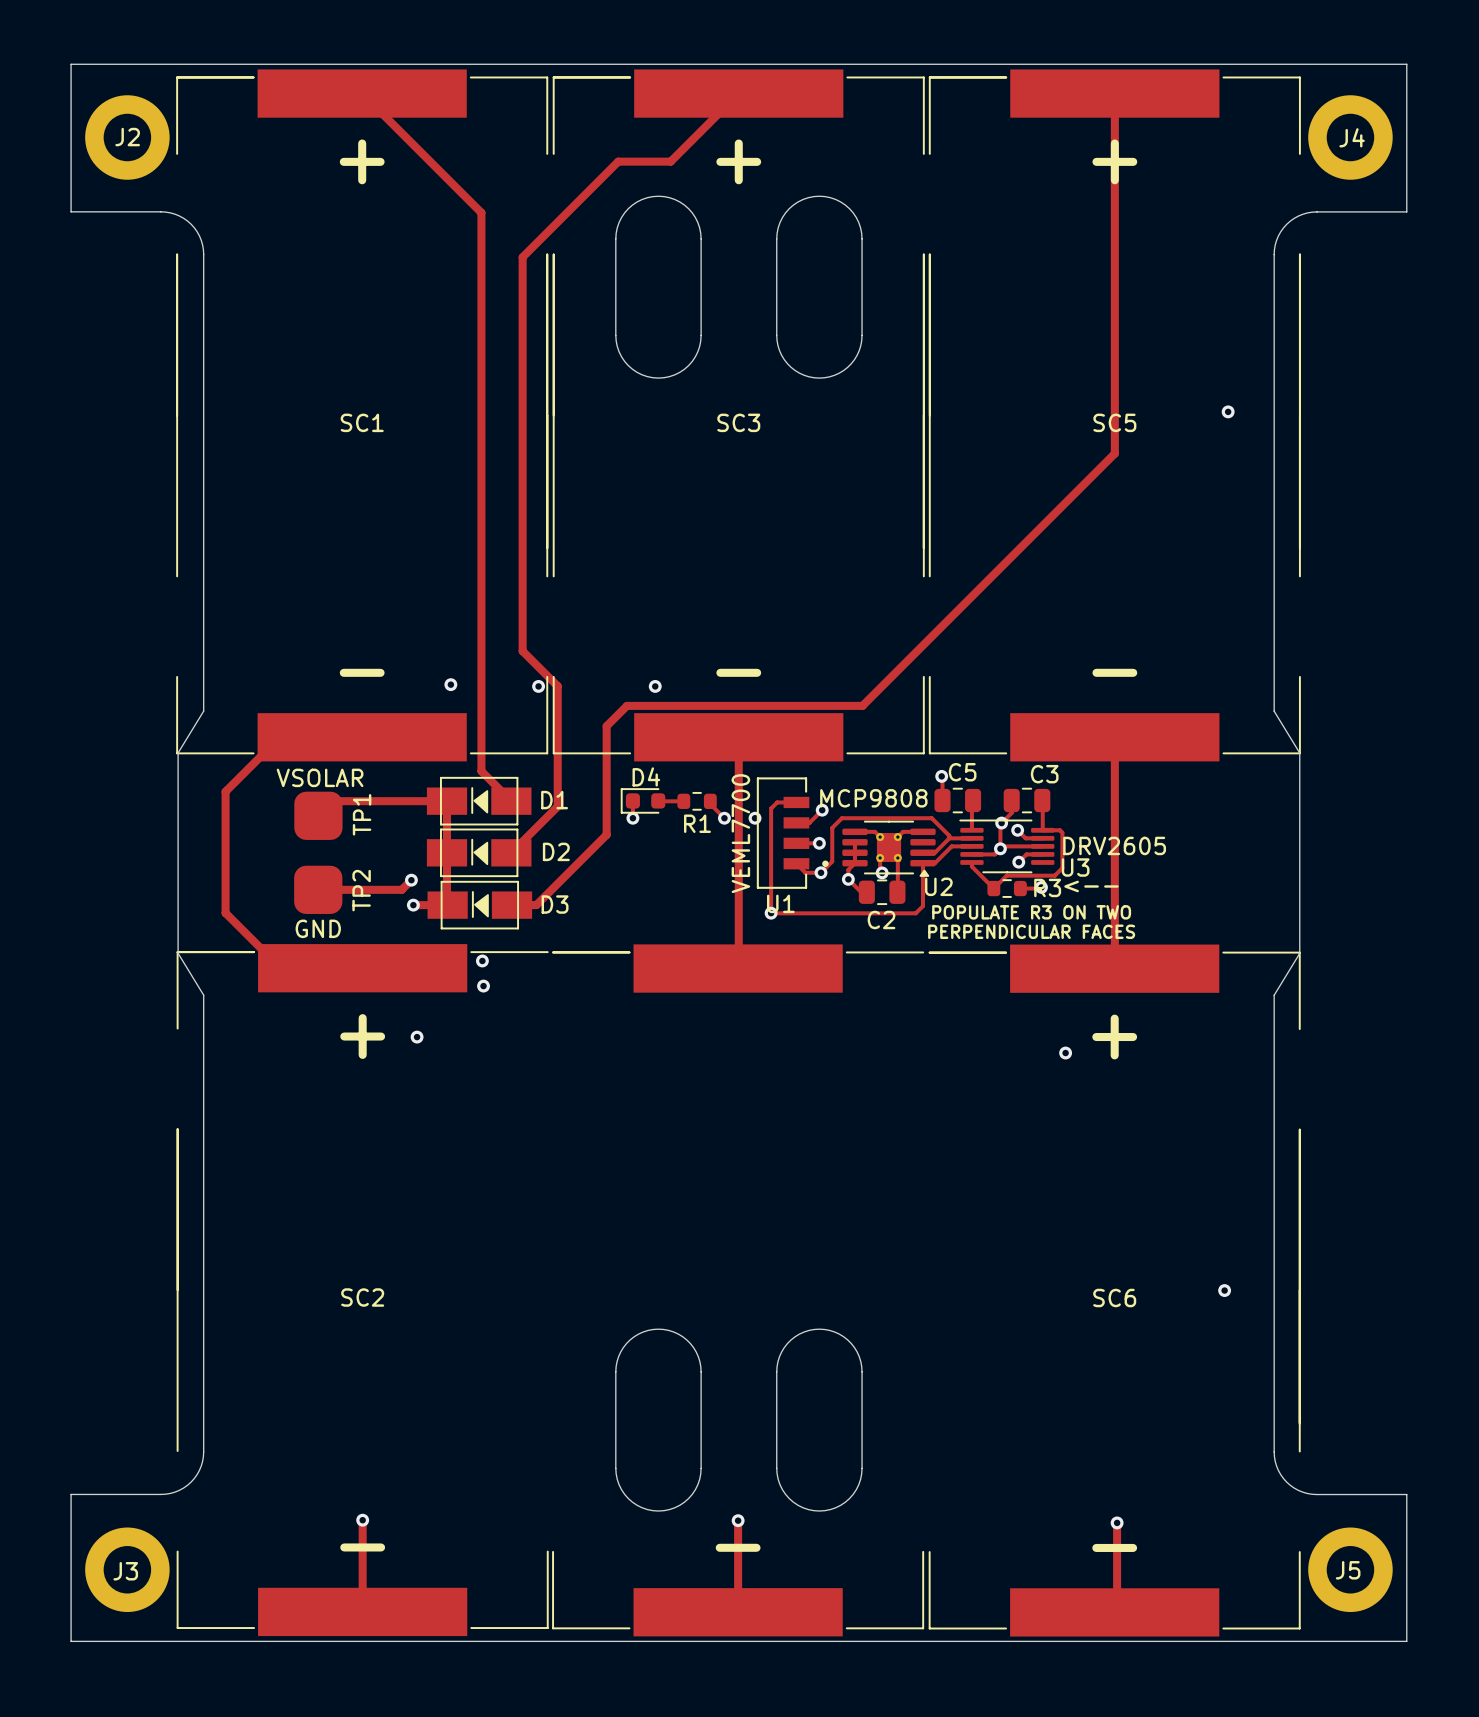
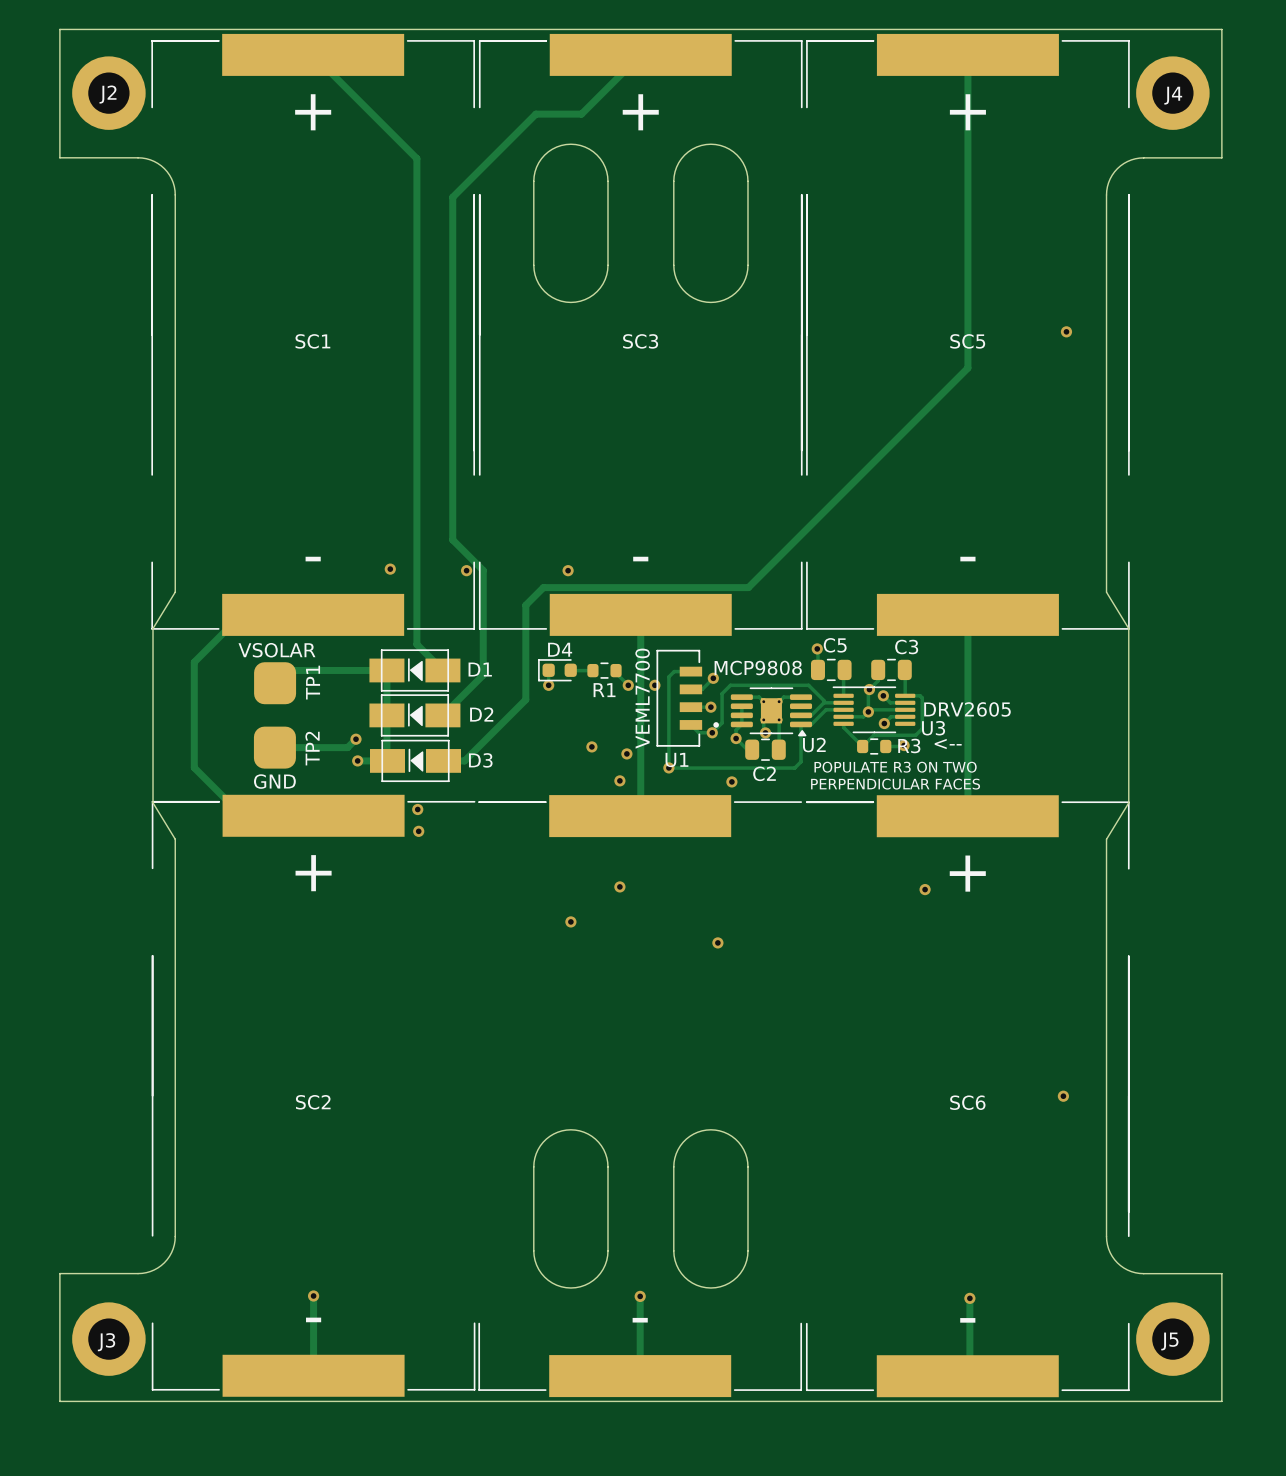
via: none -> (591, 746)
via: none -> (626, 753)
via: none -> (619, 780)
via: none -> (731, 781)
via: (417, 1037) -> none
via: none -> (619, 886)
via: none -> (570, 921)
via: none -> (717, 942)

